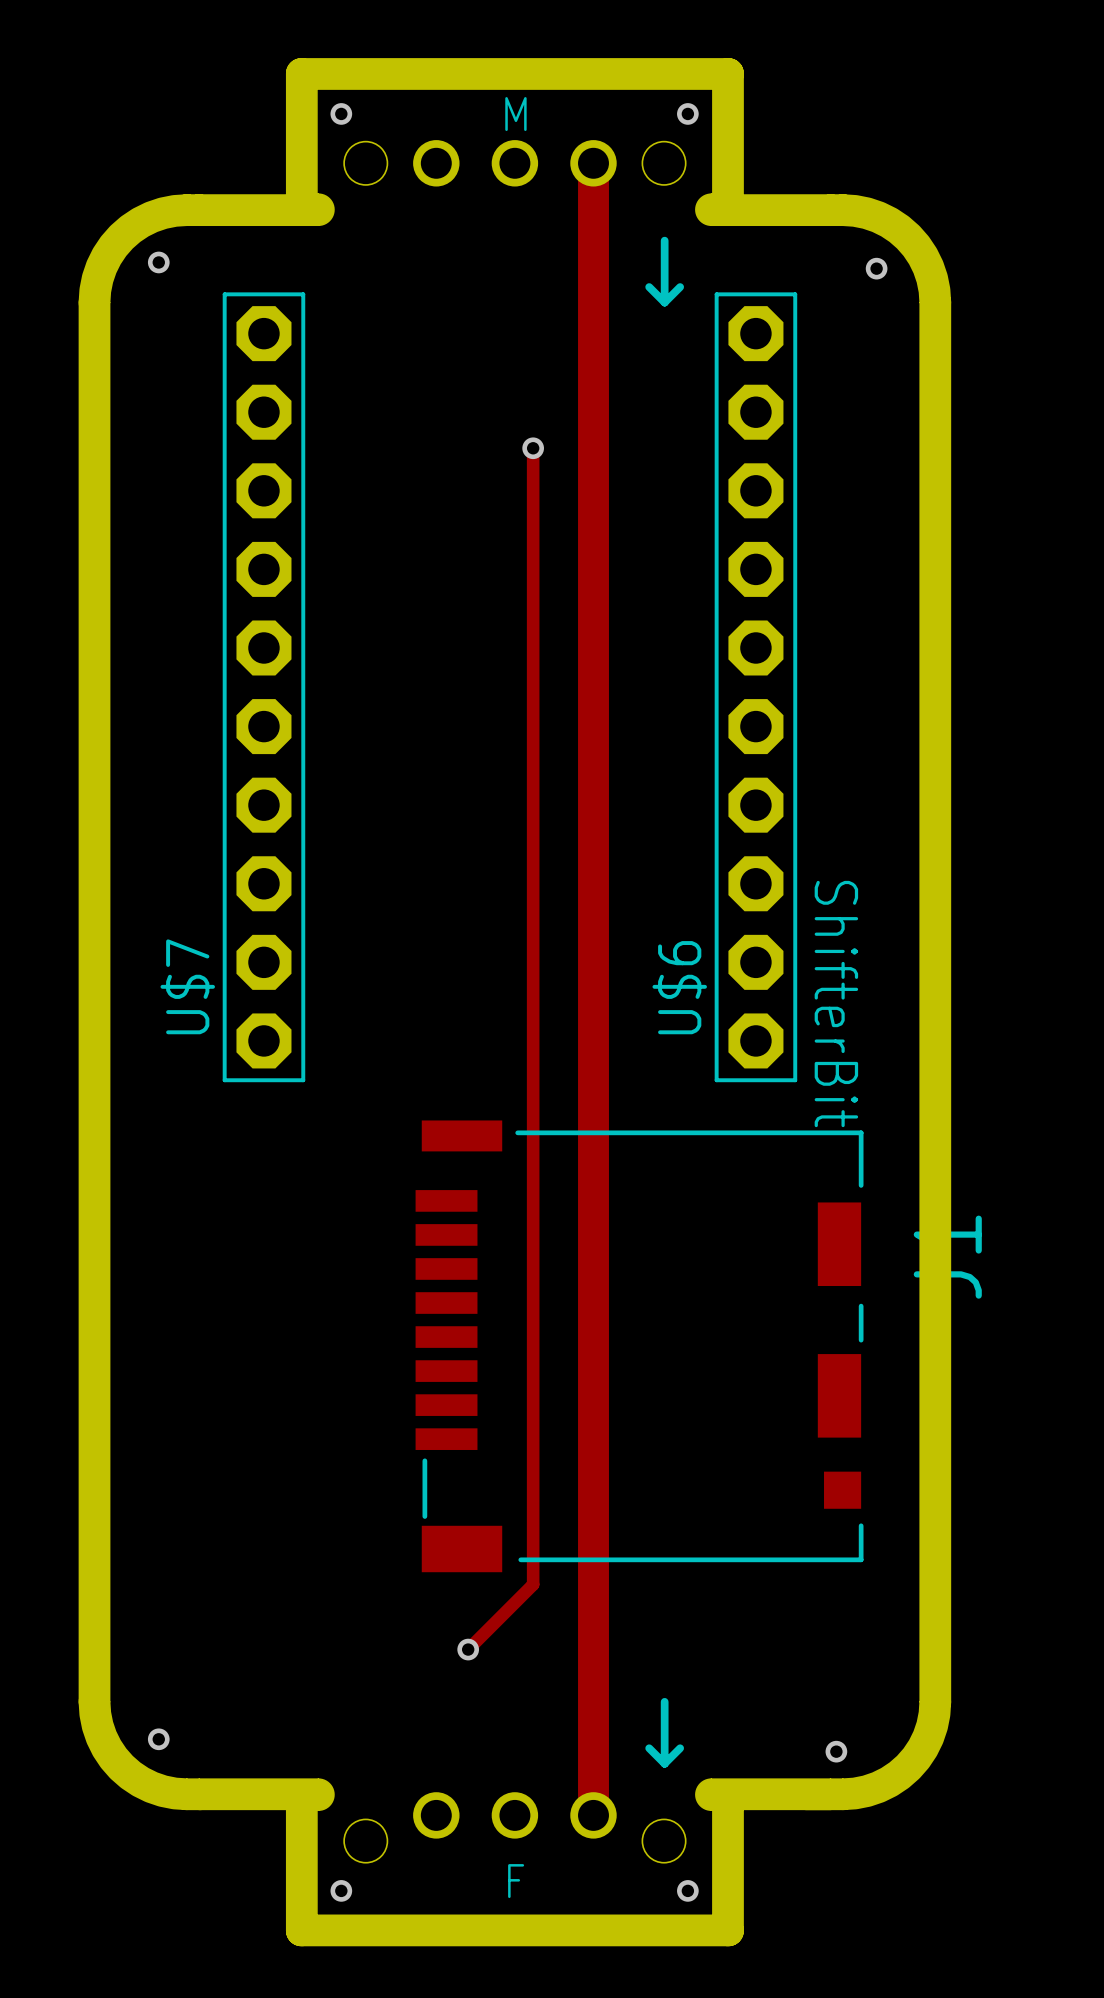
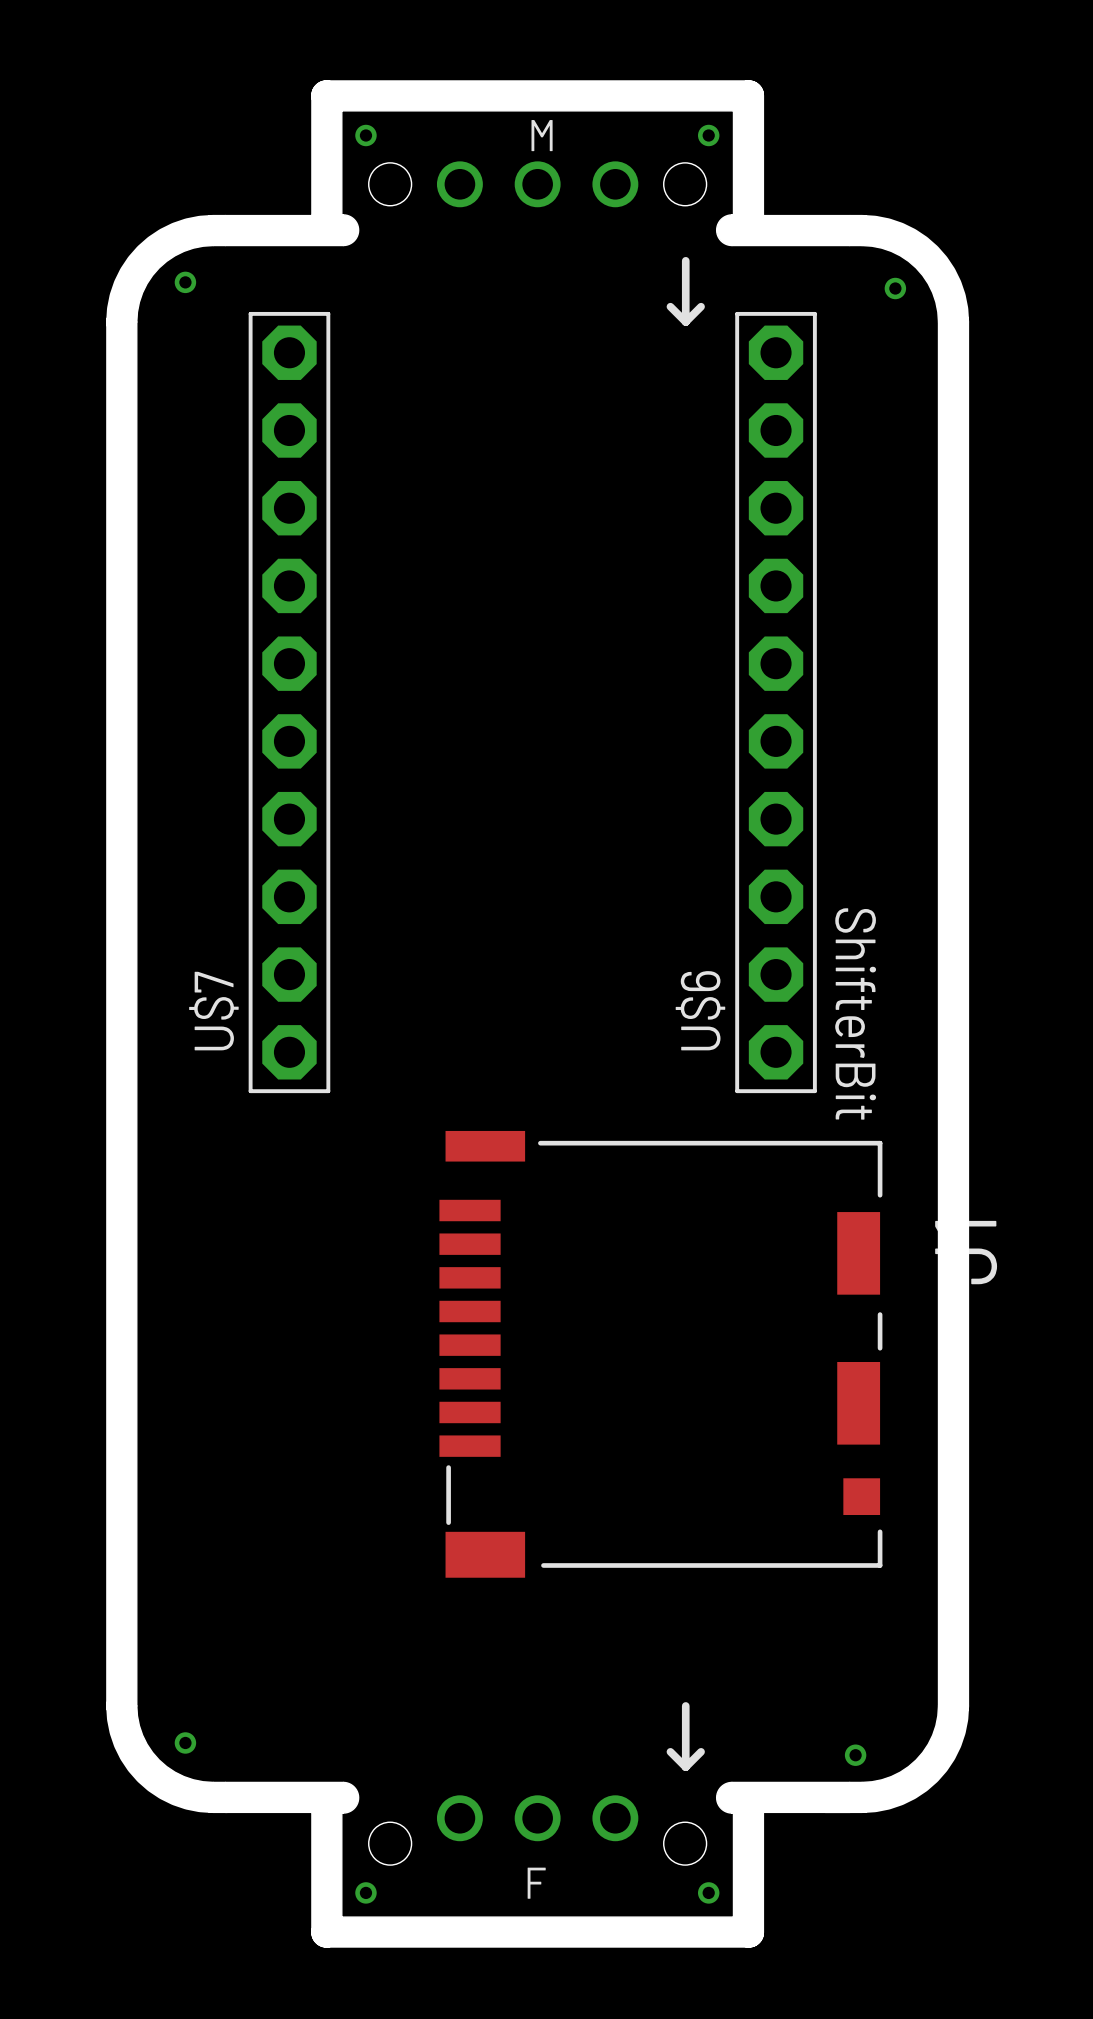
track: (593, 163) (593, 1815) -> none
track: (533, 448) (533, 1584) (468, 1649) -> none
via: (533, 448) -> none
via: (468, 1649) -> none

